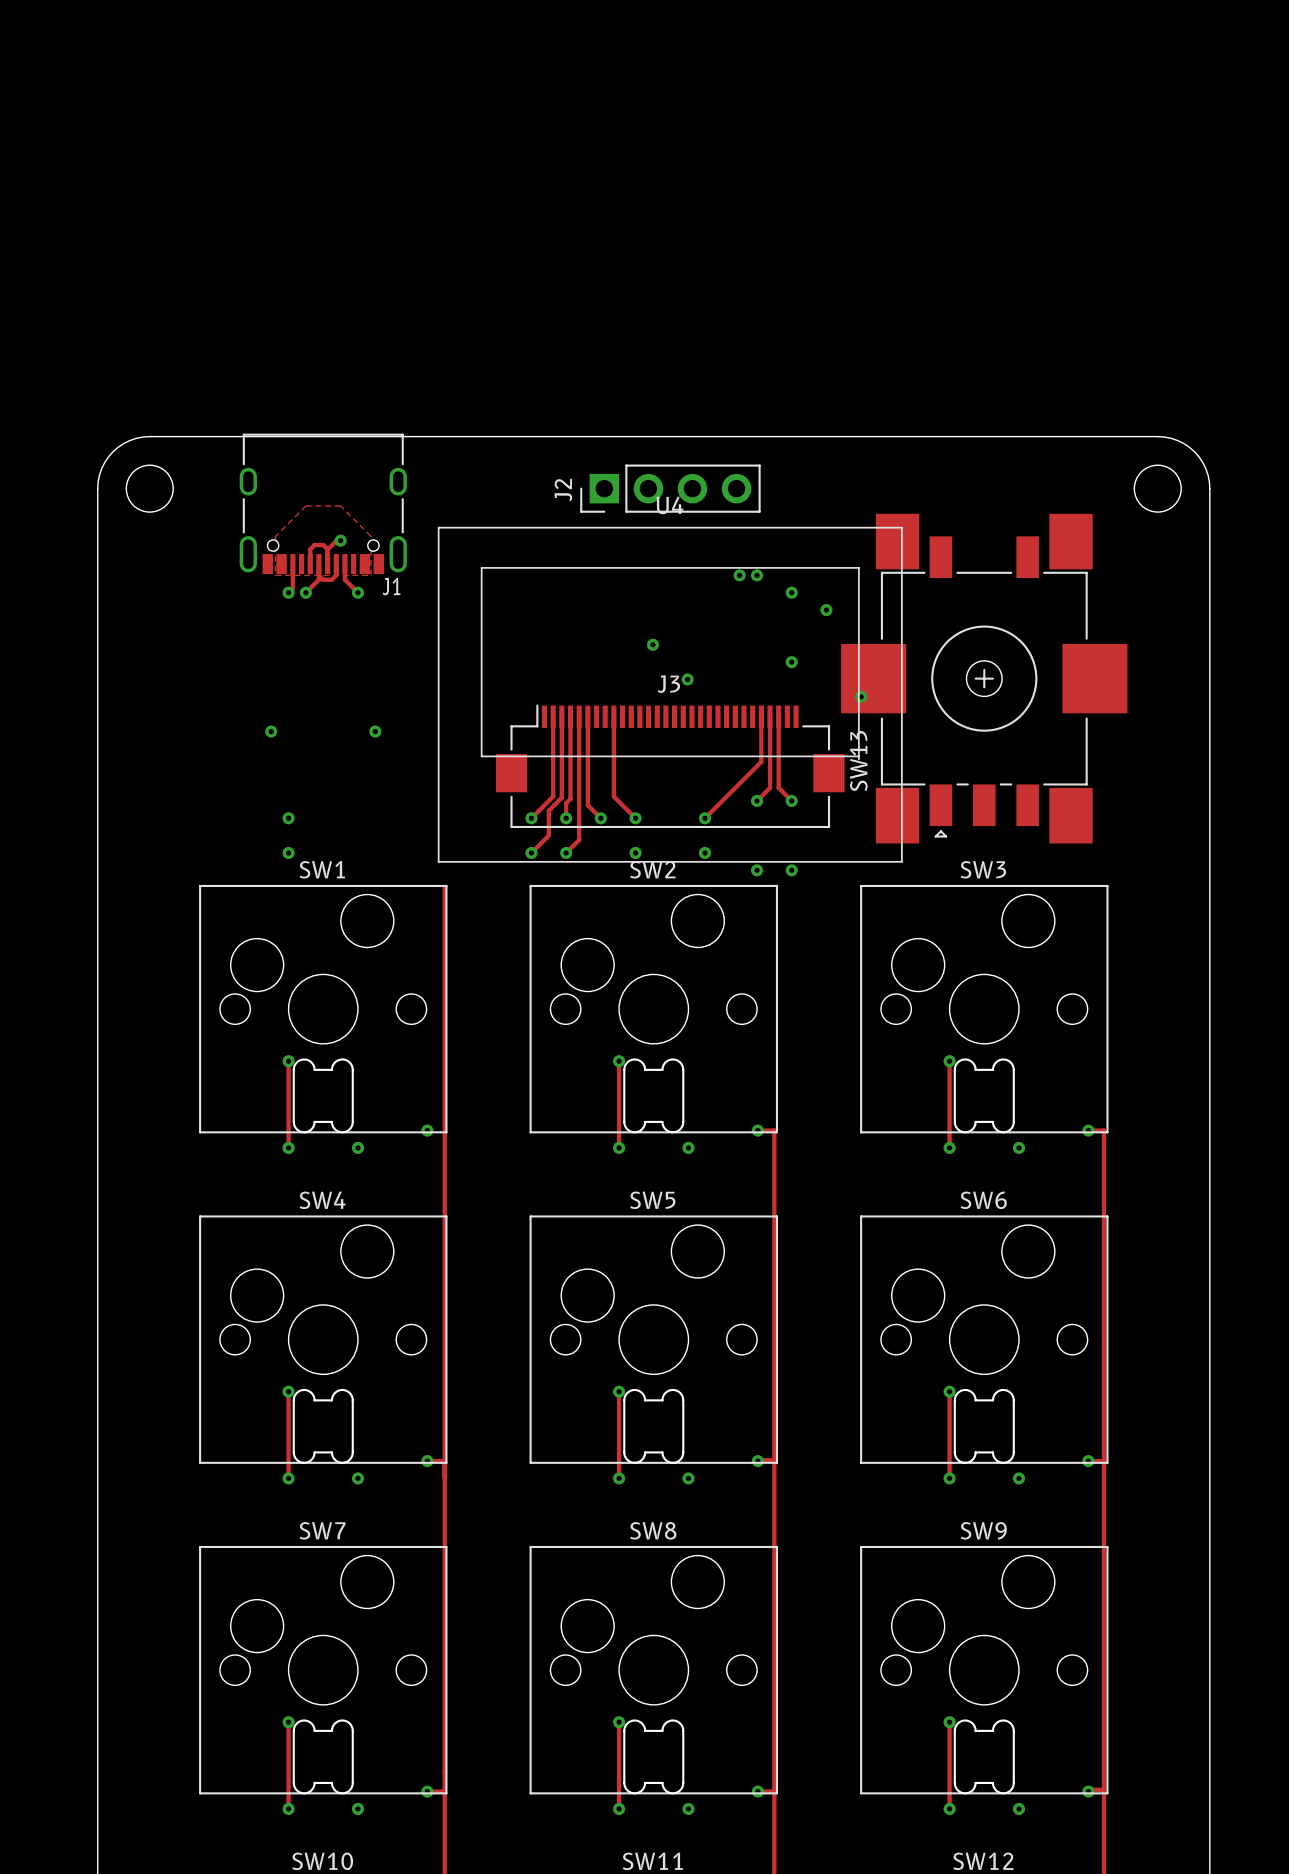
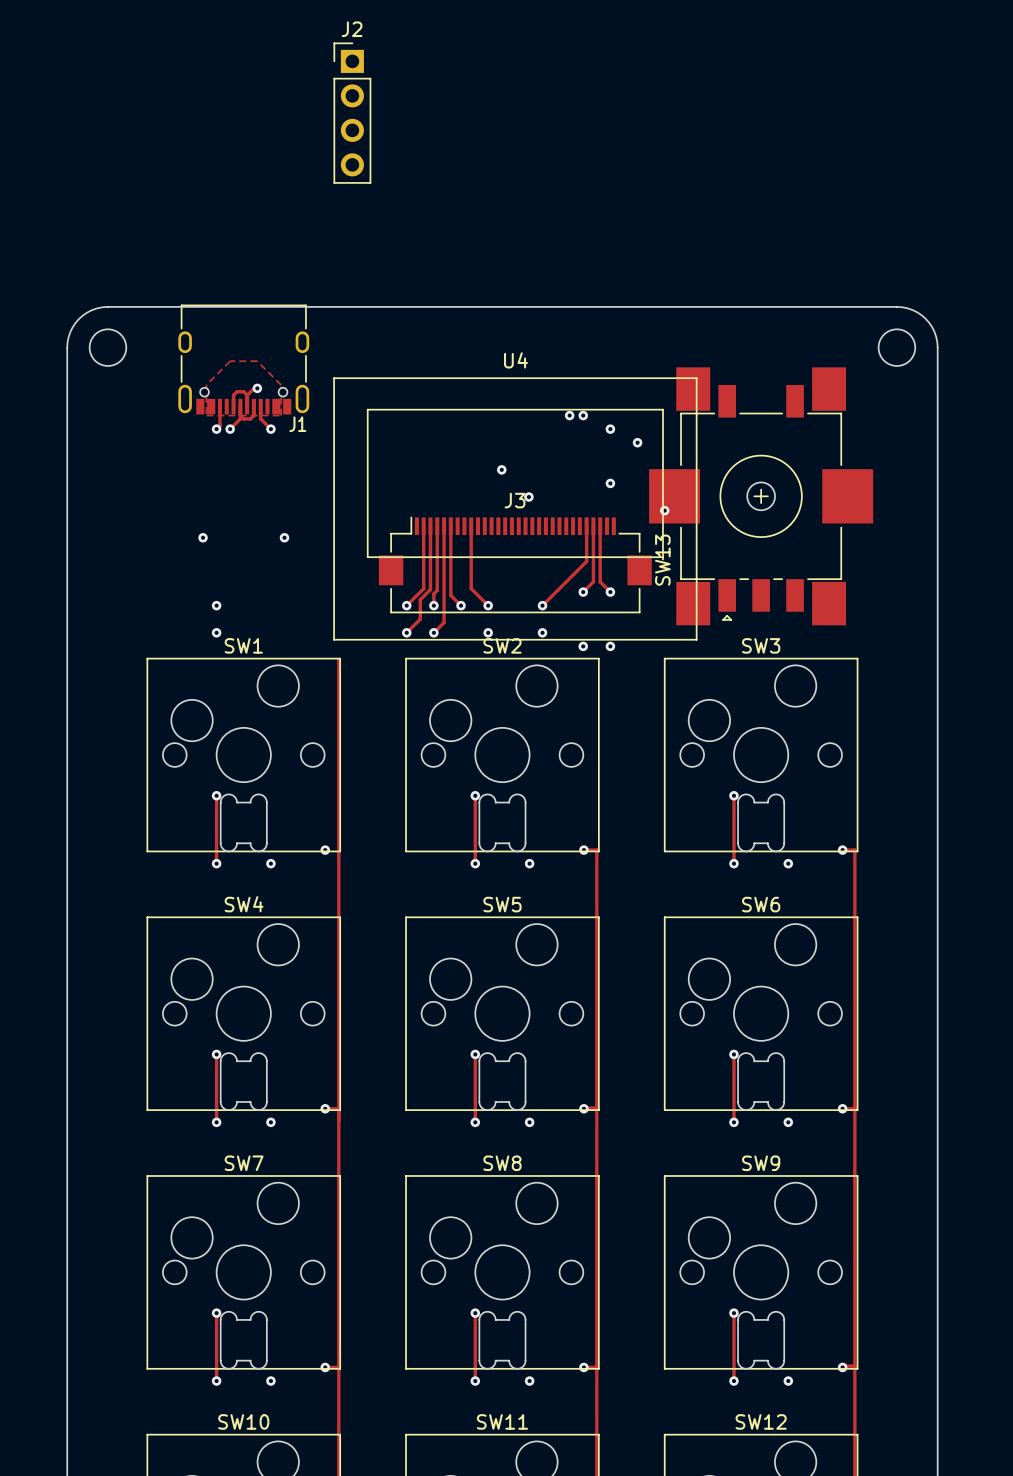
J2 rotation: 0° (670, 488) -> 90° clockwise (352, 113)
J2 position: (670, 488) -> (352, 113)

